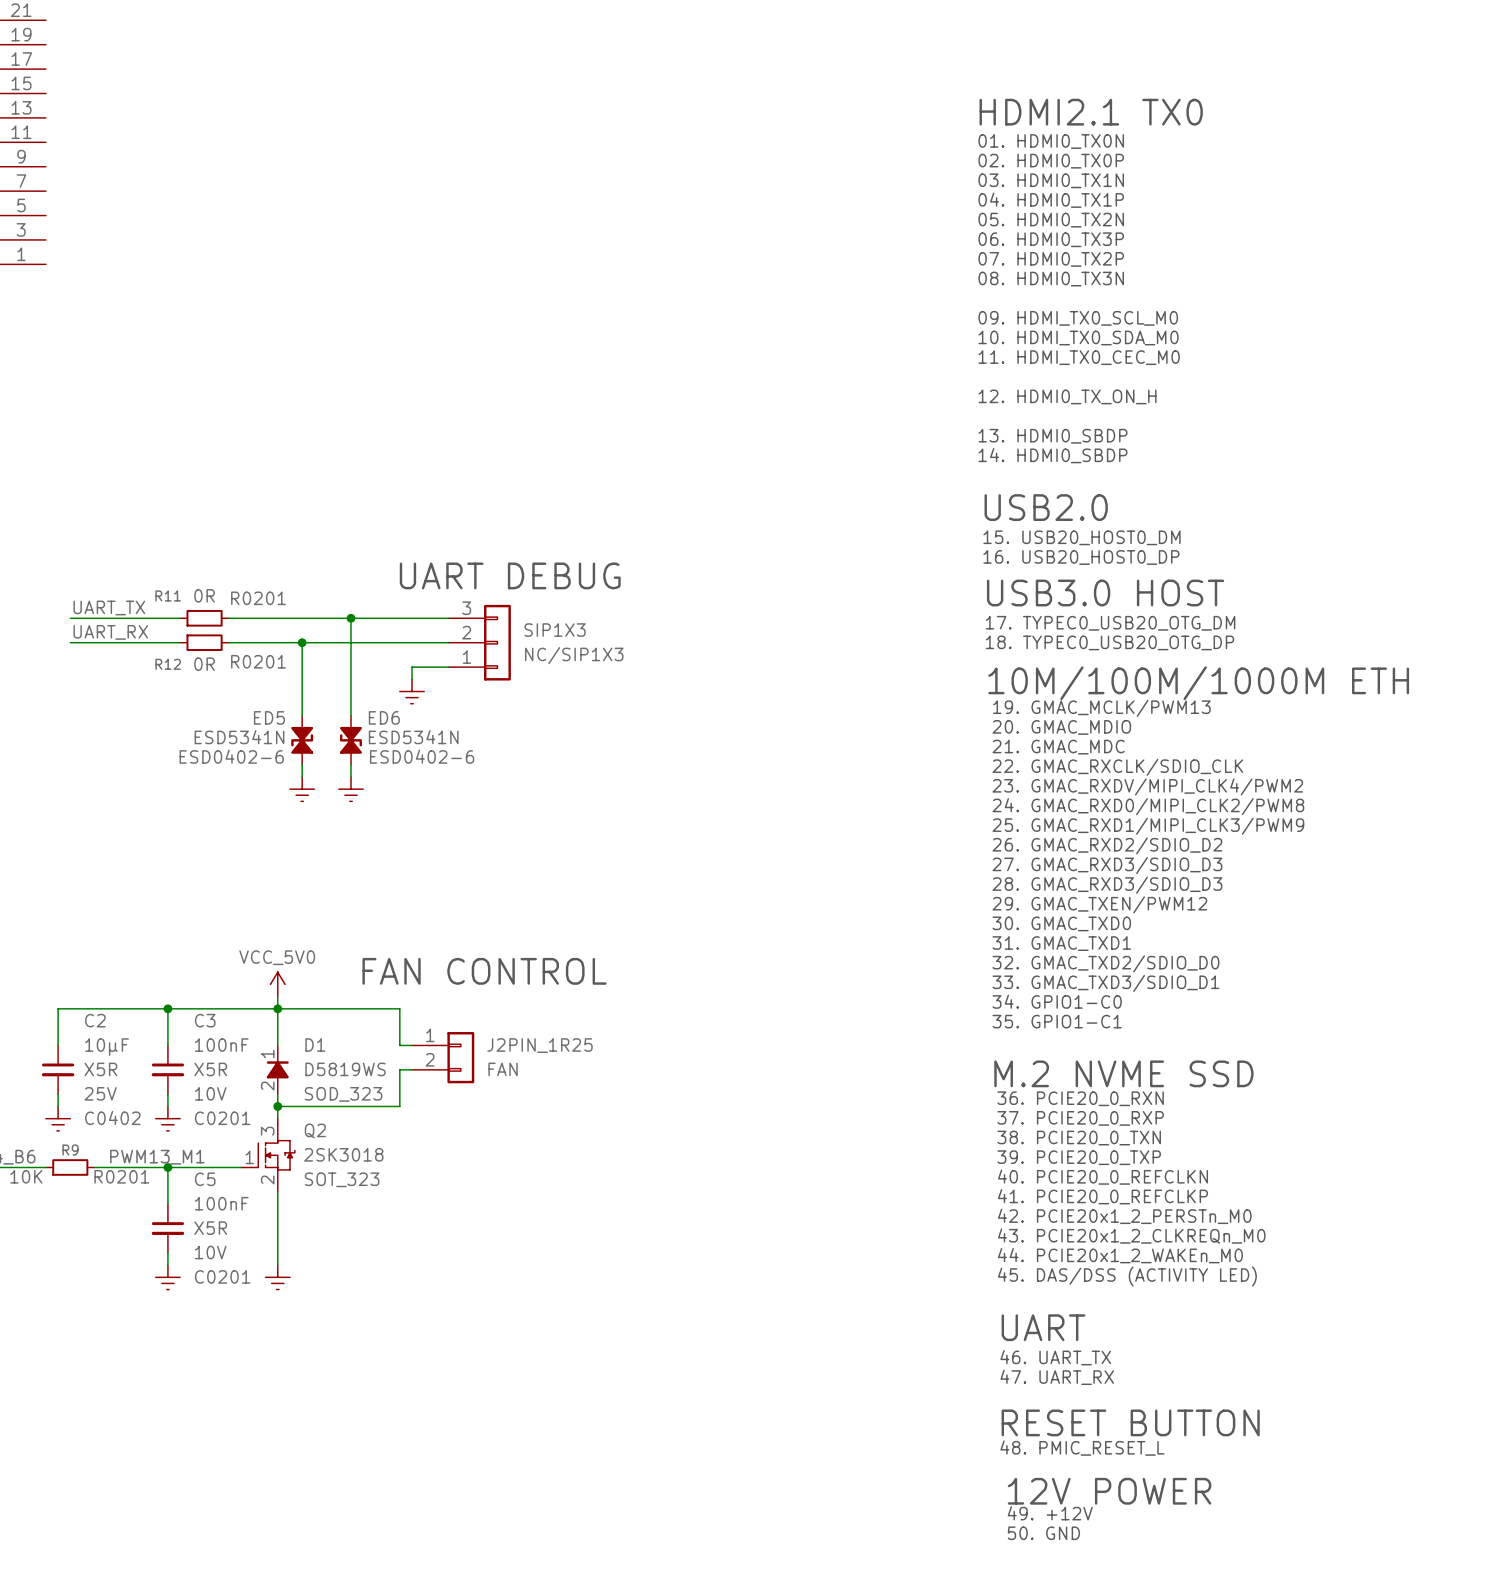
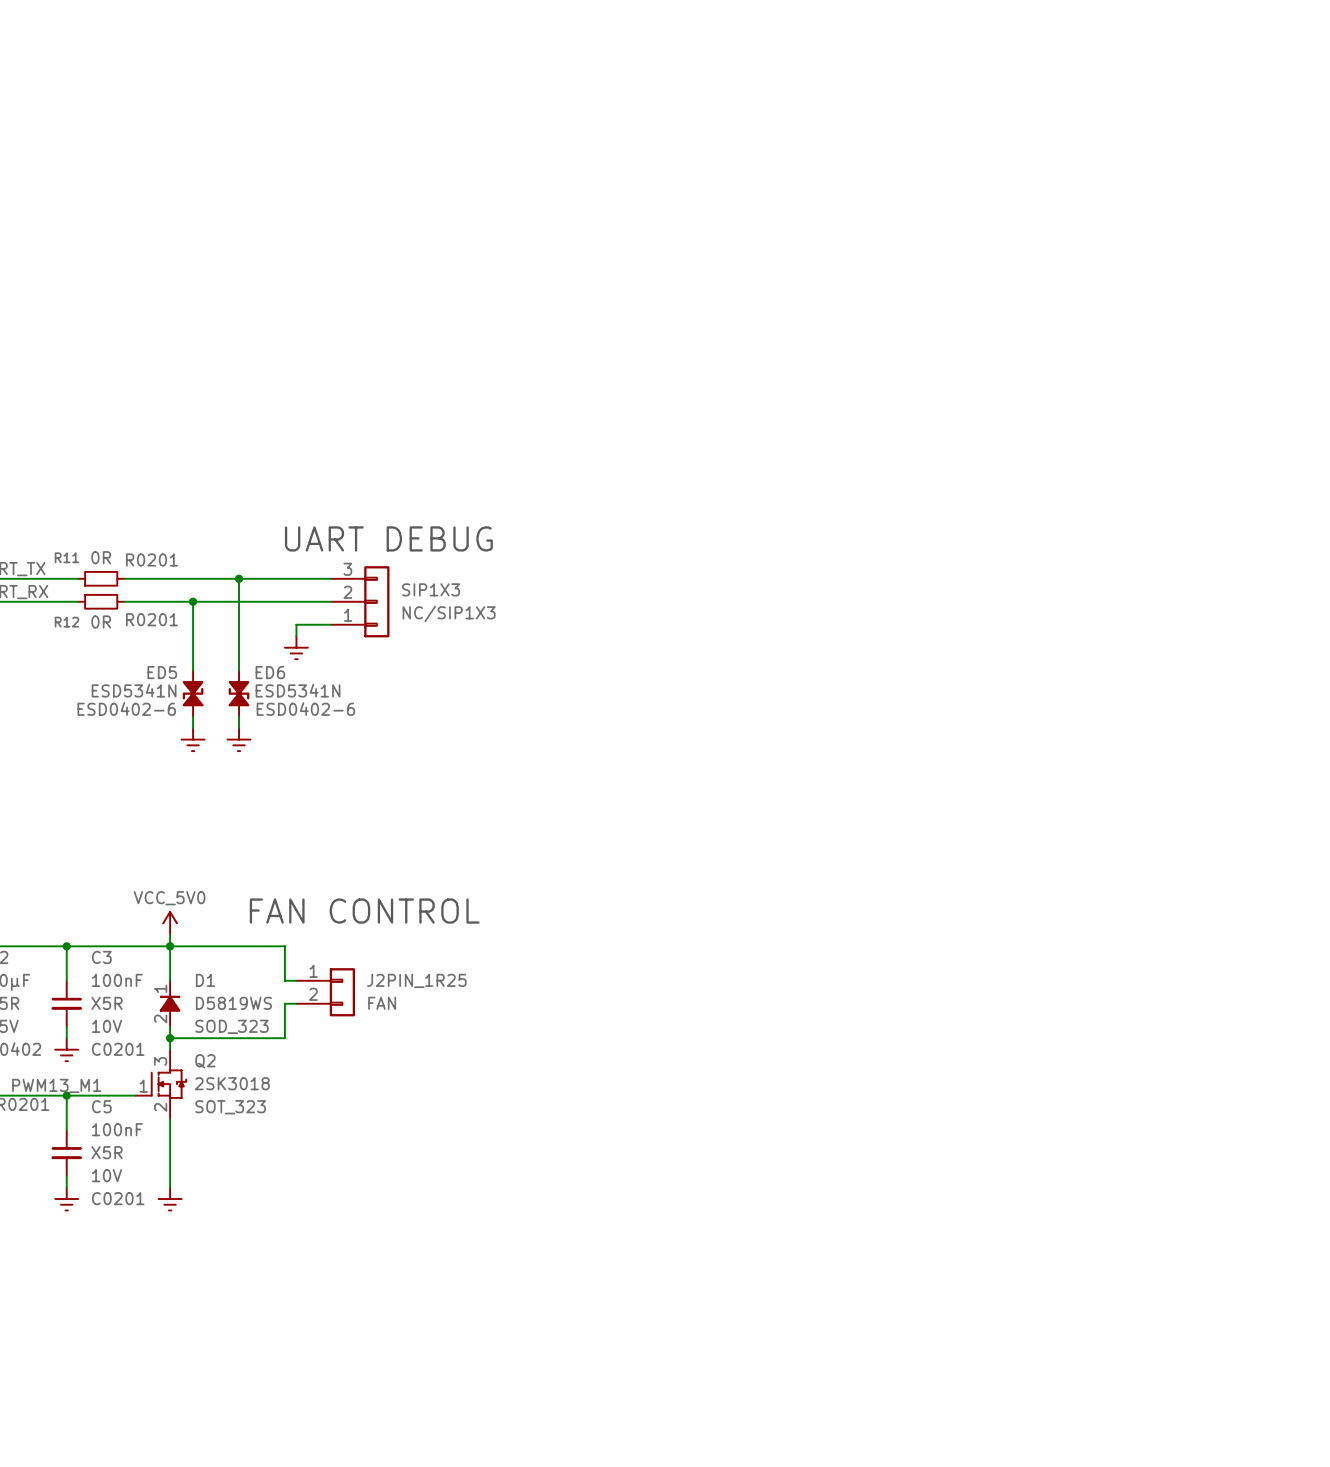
text: HDMI2.1 TX0 (1091, 112) -> none
text: 01. HDMI0_TX0N (1051, 141) -> none
text: 02. HDMI0_TX0P (1051, 161) -> none
text: 03. HDMI0_TX1N (1051, 180) -> none
text: 04. HDMI0_TX1P (1051, 200) -> none
text: 05. HDMI0_TX2N (1051, 220) -> none
text: 06. HDMI0_TX3P (1051, 239) -> none
text: 07. HDMI0_TX2P (1051, 259) -> none
text: 08. HDMI0_TX3N (1051, 279) -> none
text: 09. HDMI_TX0_SCL_M0 (1078, 318) -> none
text: 10. HDMI_TX0_SDA_M0 (1078, 338) -> none
text: 11. HDMI_TX0_CEC_M0 (1079, 357) -> none
text: 12. HDMI0_TX_ON_H (1067, 396) -> none
text: 13. HDMI0_SBDP (1052, 436) -> none
text: 14. HDMI0_SBDP (1052, 455) -> none
text: USB2.0 (1046, 507) -> none
text: 15. USB20_HOST0_DM (1081, 537) -> none
text: 16. USB20_HOST0_DP (1081, 557) -> none
text: USB3.0 HOST (1105, 593) -> none
text: 17. TYPEC0_USB20_OTG_DM (1110, 623) -> none
text: 18. TYPEC0_USB20_OTG_DP (1109, 642) -> none
text: 10M/100M/1000M ETH (1198, 683) -> none
text: 19. GMAC_MCLK/PWM13 (1101, 708) -> none
text: 20. GMAC_MDIO (1061, 727) -> none
text: 21. GMAC_MDC (1058, 747) -> none
text: 22. GMAC_RXCLK/SDIO_CLK (1117, 767) -> none
text: 23. GMAC_RXDV/MIPI_CLK4/PWM2 (1147, 786) -> none
text: 24. GMAC_RXD0/MIPI_CLK2/PWM8 (1148, 806) -> none
text: 25. GMAC_RXD1/MIPI_CLK3/PWM9 (1148, 826) -> none
text: 26. GMAC_RXD2/SDIO_D2 (1107, 845) -> none
text: 27. GMAC_RXD3/SDIO_D3 (1107, 865) -> none
text: 28. GMAC_RXD3/SDIO_D3 (1107, 885) -> none
text: 29. GMAC_TXEN/PWM12 (1099, 904) -> none
text: 30. GMAC_TXD0 (1061, 923) -> none
text: 31. GMAC_TXD1 (1061, 943) -> none
text: 32. GMAC_TXD2/SDIO_D0 (1105, 963) -> none
text: 33. GMAC_TXD3/SDIO_D1 (1105, 983) -> none
text: 34. GPIO1-C0 (1057, 1001) -> none
text: 35. GPIO1-C1 (1057, 1021) -> none
text: M.2 NVME SSD (1123, 1073) -> none
text: 36. PCIE20_0_RXN (1080, 1098) -> none
text: 37. PCIE20_0_RXP (1080, 1118) -> none
text: 38. PCIE20_0_TXN (1079, 1138) -> none
text: 39. PCIE20_0_TXP (1079, 1157) -> none
text: 40. PCIE20_0_REFCLKN (1103, 1177) -> none
text: 41. PCIE20_0_REFCLKP (1103, 1196) -> none
text: 42. PCIE20x1_2_PERSTn_M0 (1124, 1216) -> none
text: 43. PCIE20x1_2_CLKREQn_M0 (1131, 1236) -> none
text: 44. PCIE20x1_2_WAKEn_M0 (1120, 1255) -> none
text: 45. DAS/DSS (ACTIVITY LED) (1127, 1276) -> none
text: UART (1043, 1327) -> none
text: 46. UART_TX (1055, 1357) -> none
text: 47. UART_RX (1057, 1377) -> none
text: RESET BUTTON (1130, 1422) -> none
text: 48. PMIC_RESET_L (1082, 1448) -> none
text: 12V POWER (1109, 1491) -> none
text: 49. +12V (1050, 1513) -> none
text: 50. GND (1043, 1533) -> none

